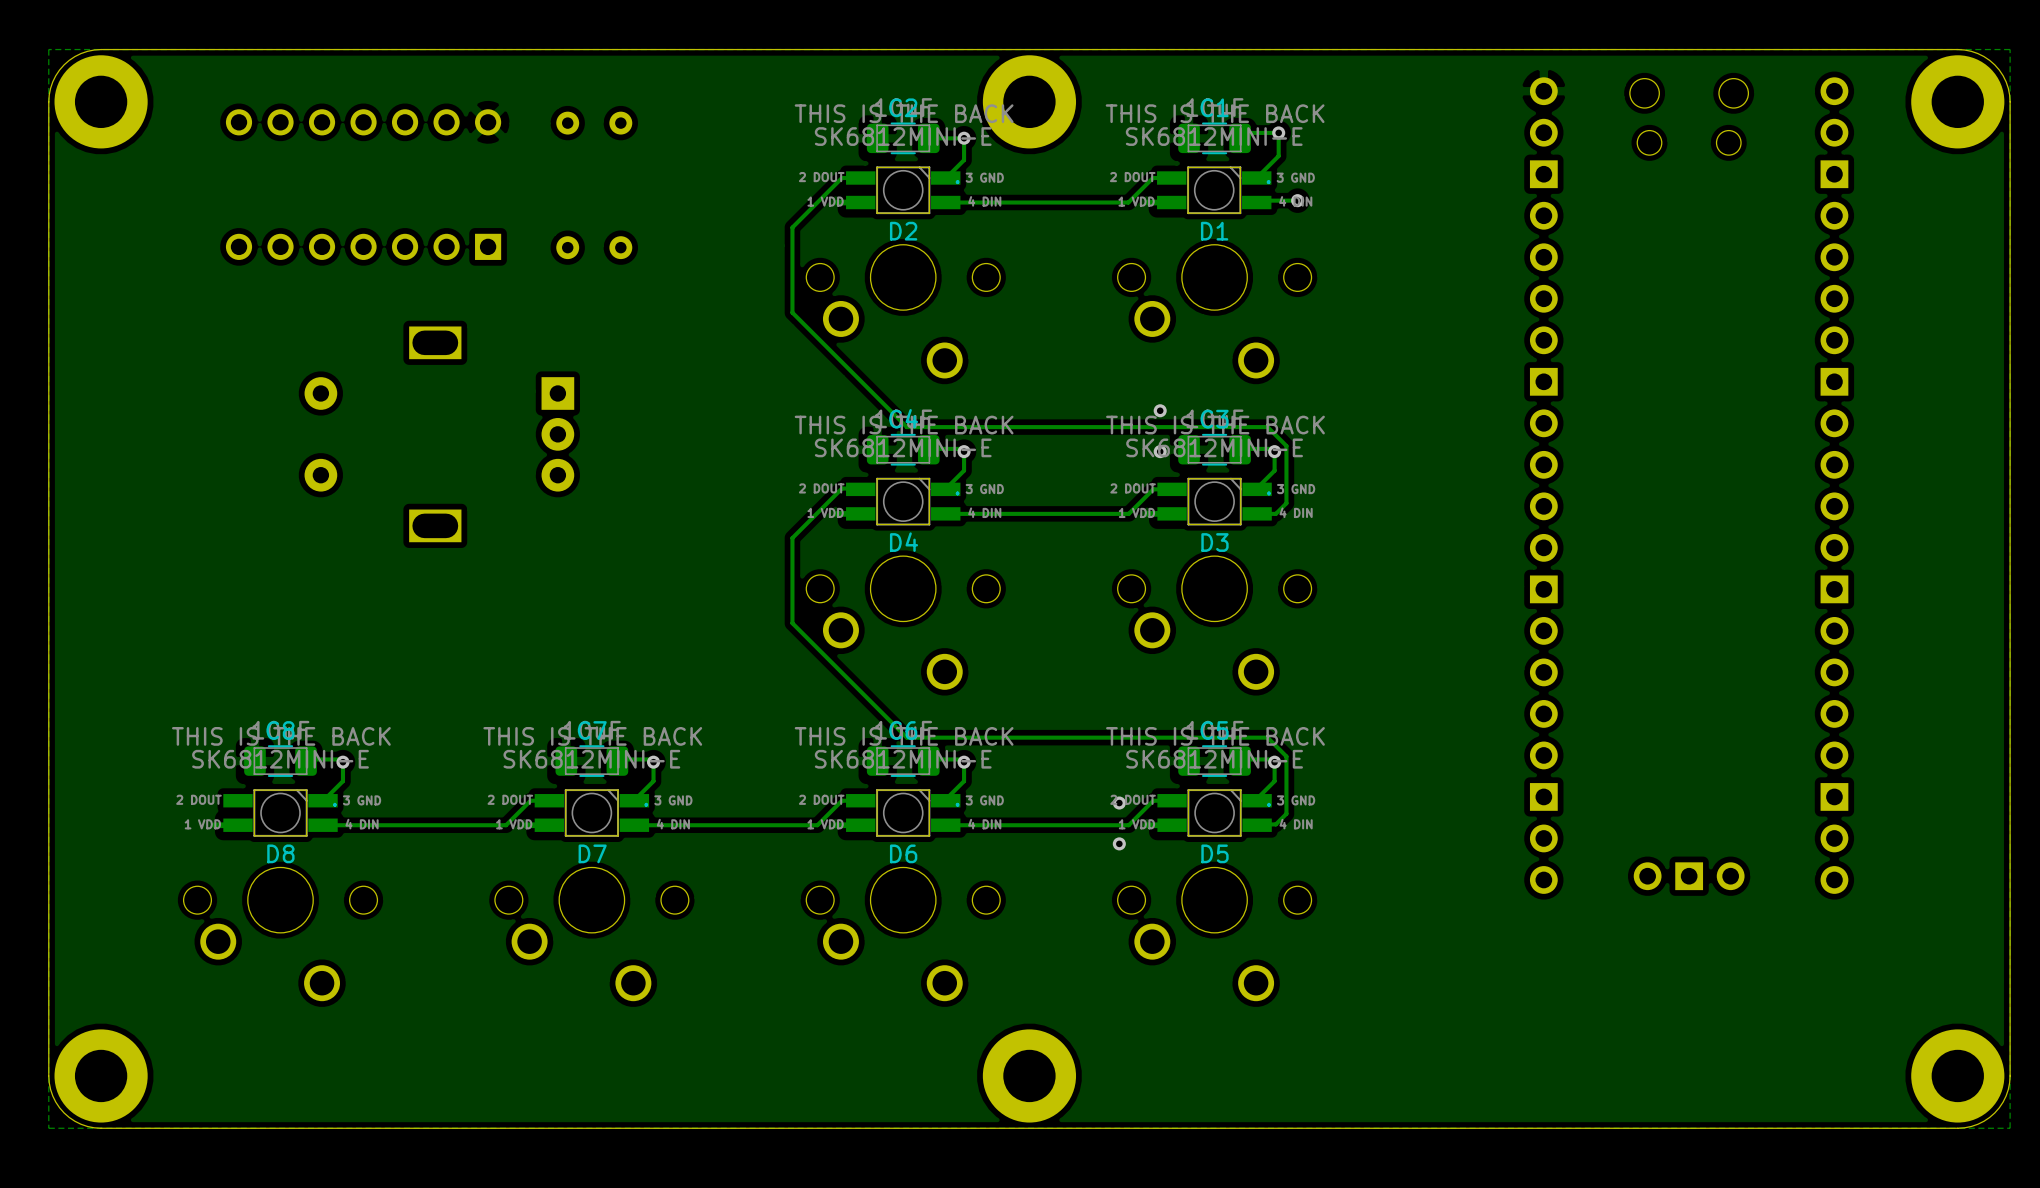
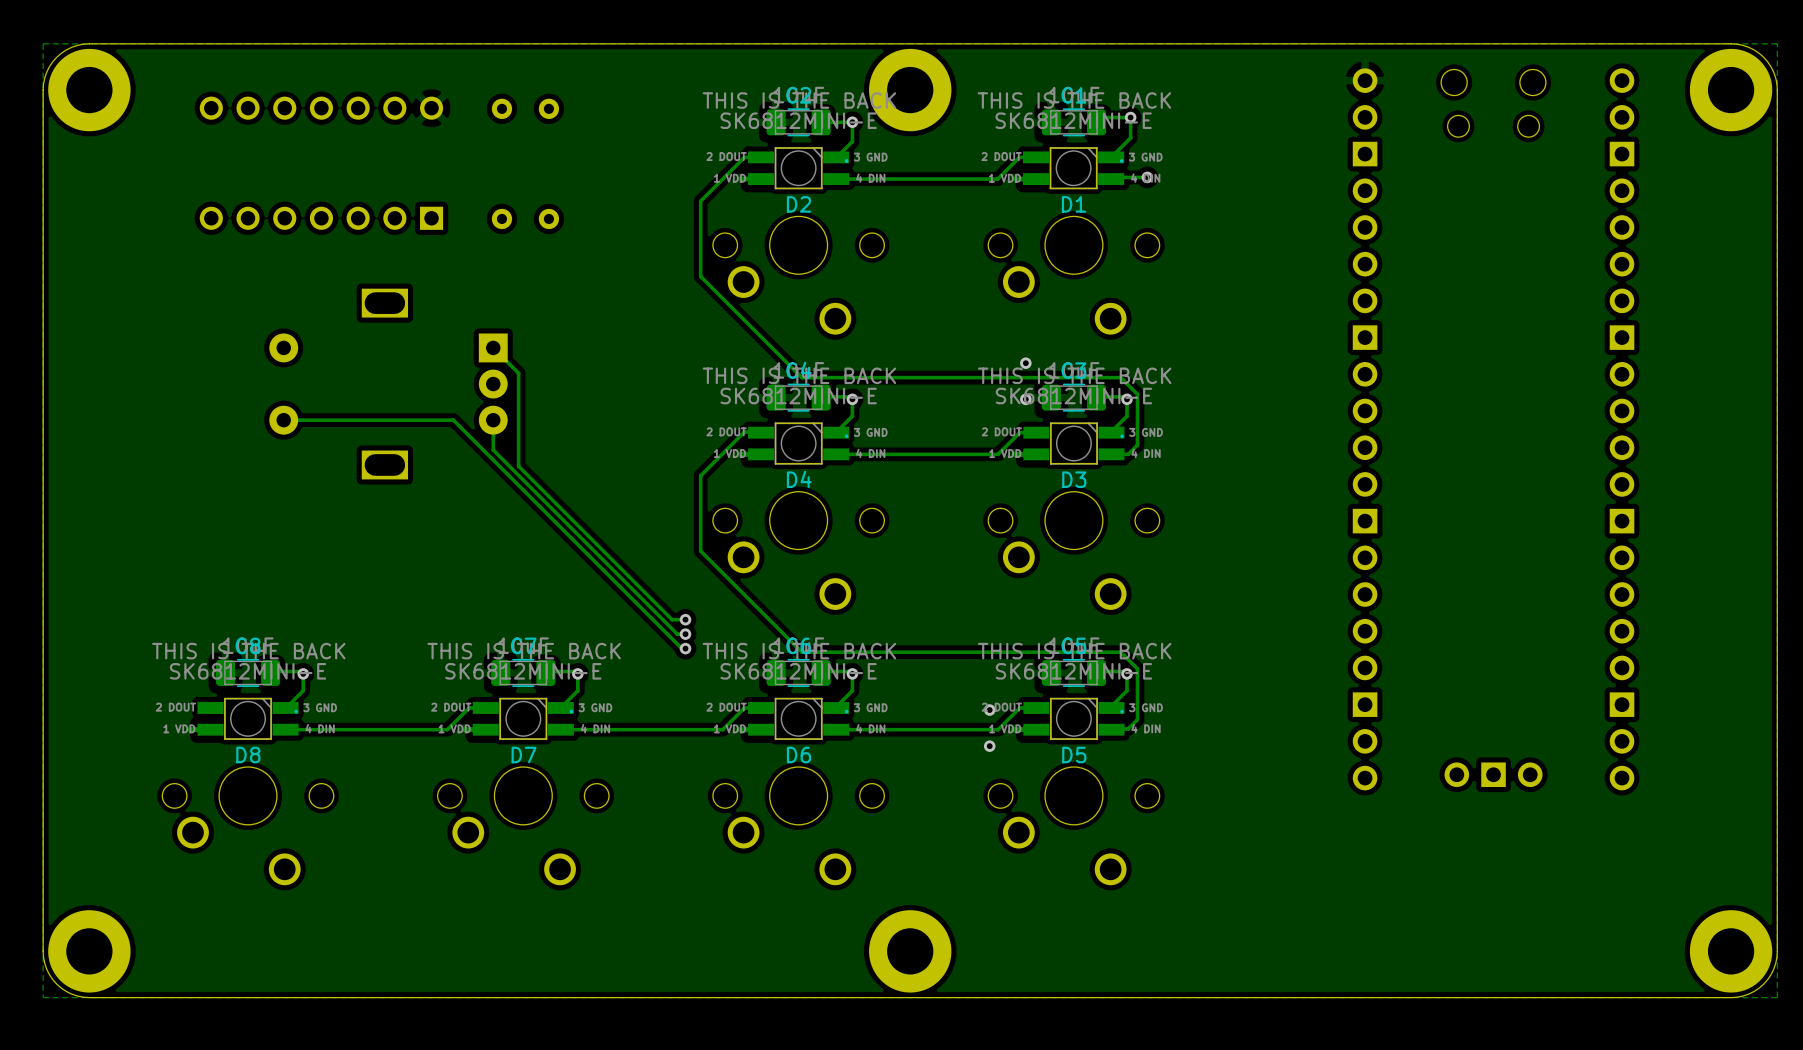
track: none -> (493, 347) (518, 373) (518, 466) (672, 619) (685, 619)
track: none -> (283, 420) (453, 420) (681, 648) (685, 648)
track: none -> (493, 420) (493, 450) (677, 634) (685, 634)
via: none -> (685, 619)
via: none -> (685, 634)
via: none -> (685, 648)

